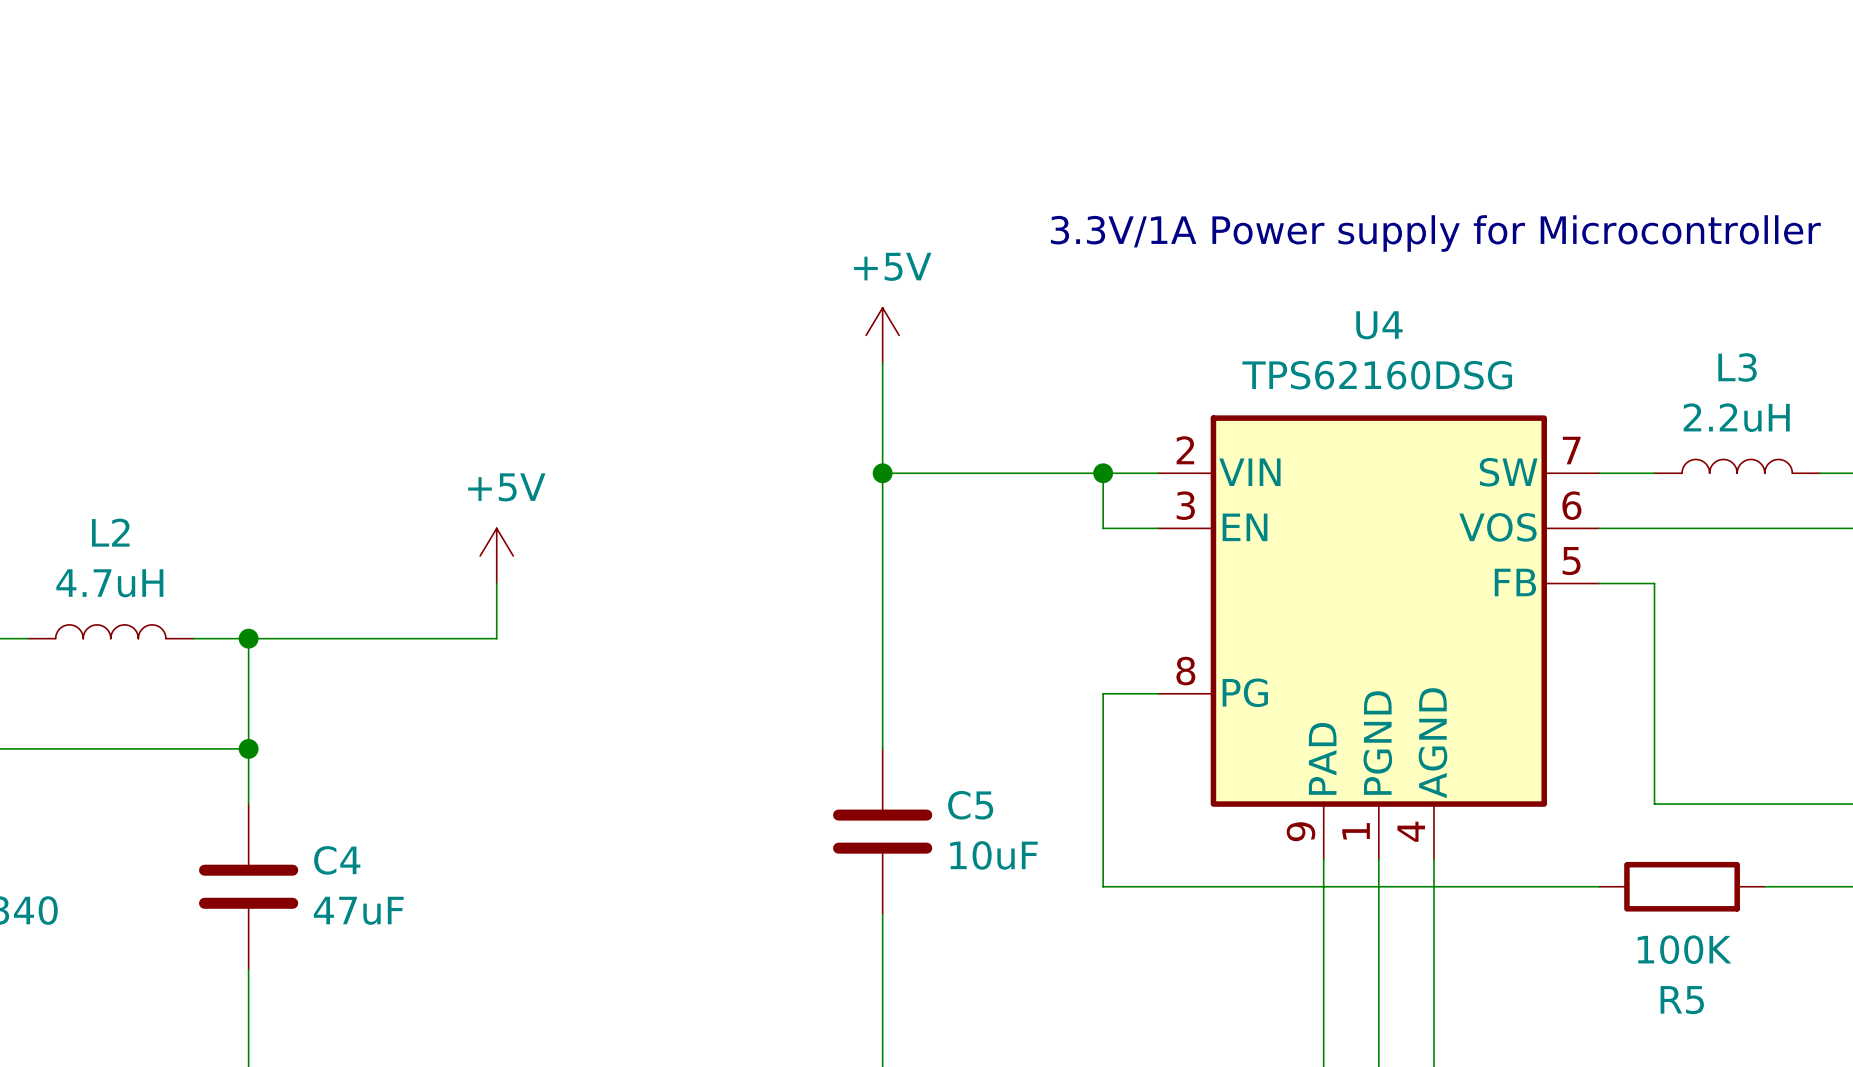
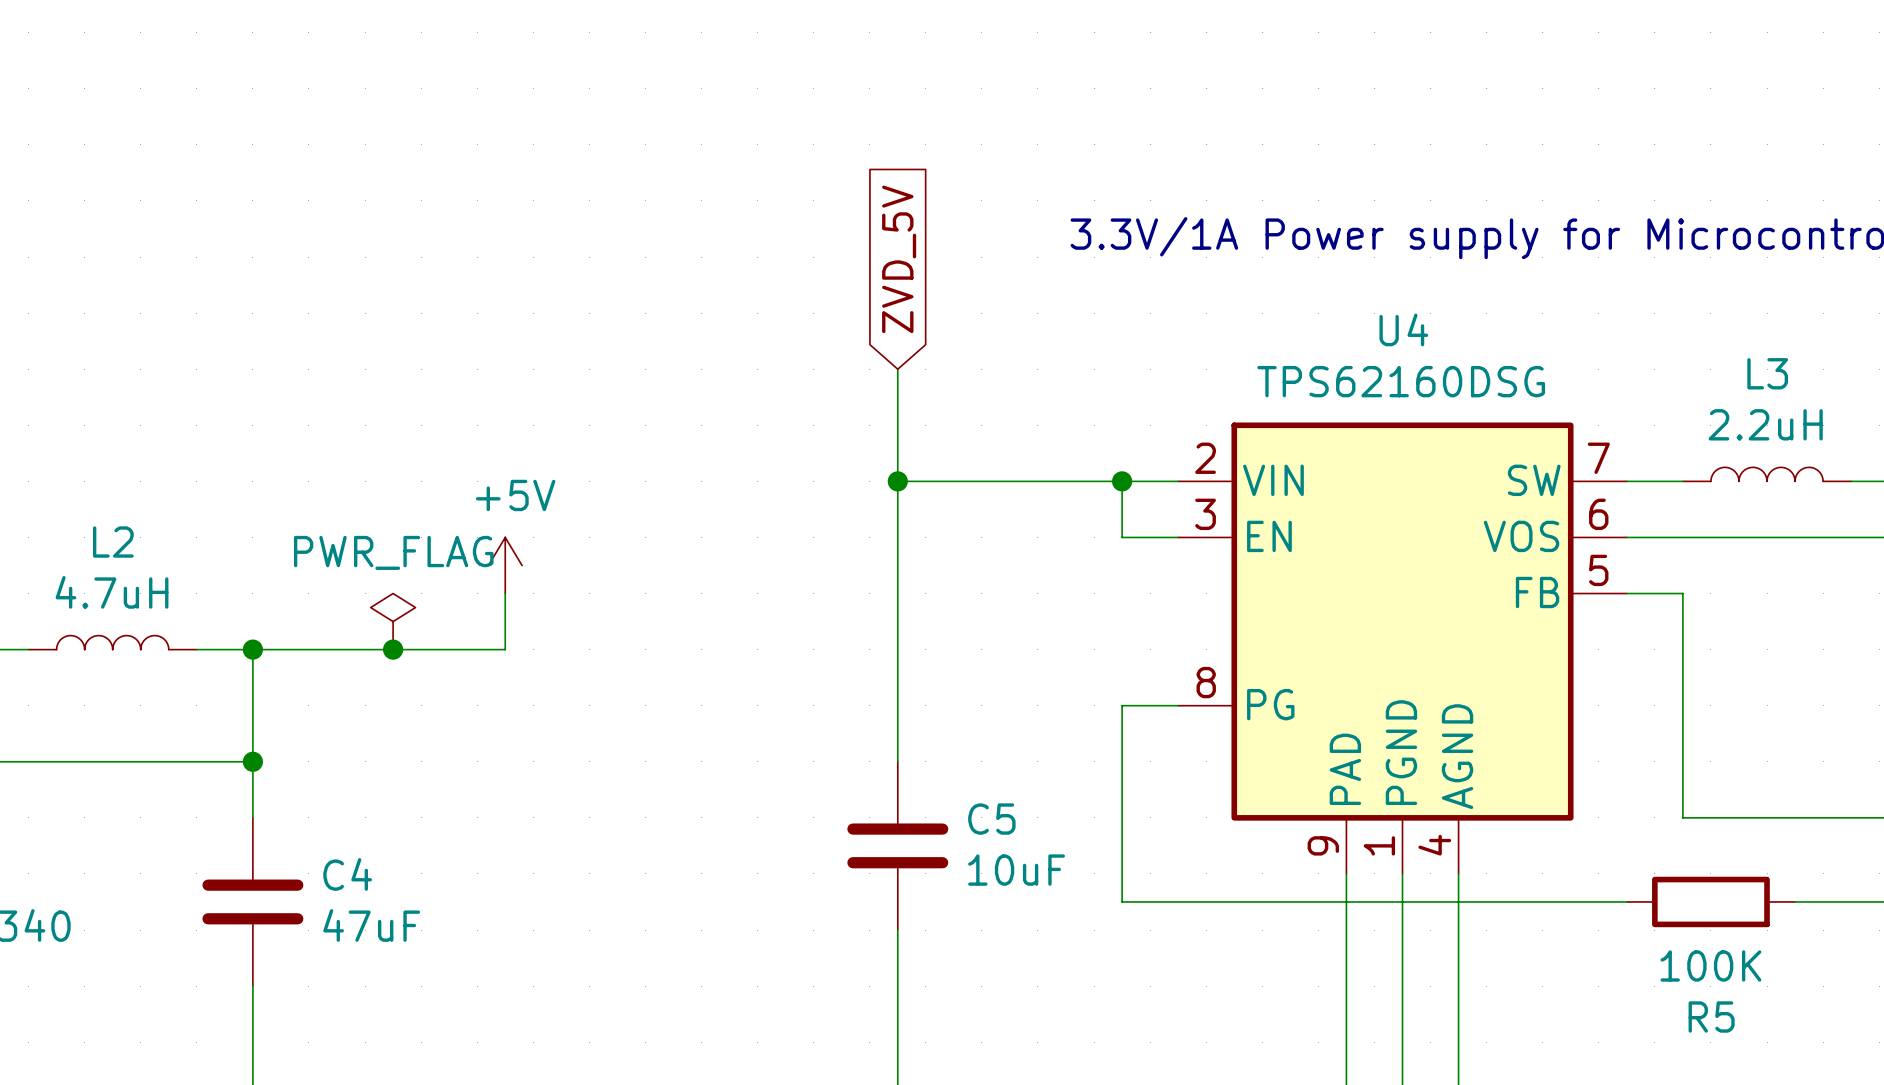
global label: none -> ZVD_5V (899, 259)
power symbol: +5V (882, 335) -> none
power symbol: none -> PWR_FLAG (393, 621)
junction: none -> (393, 649)

